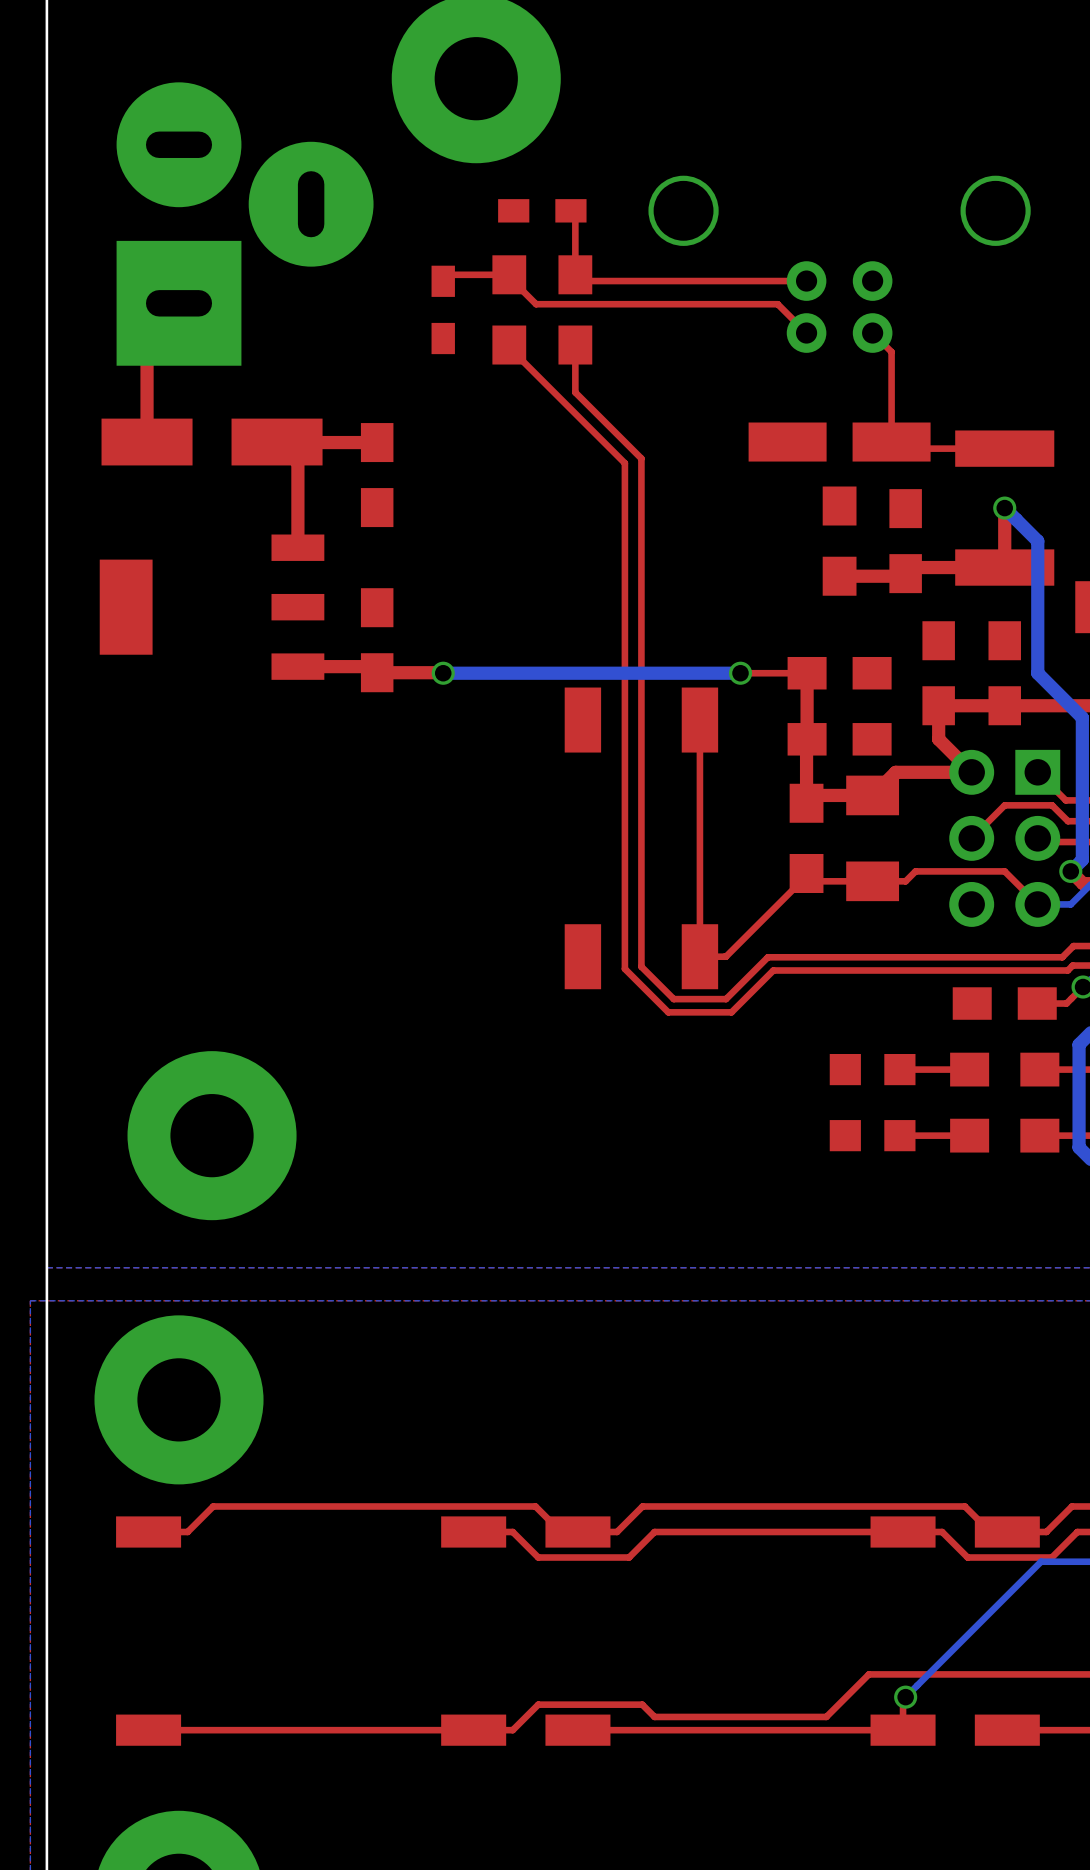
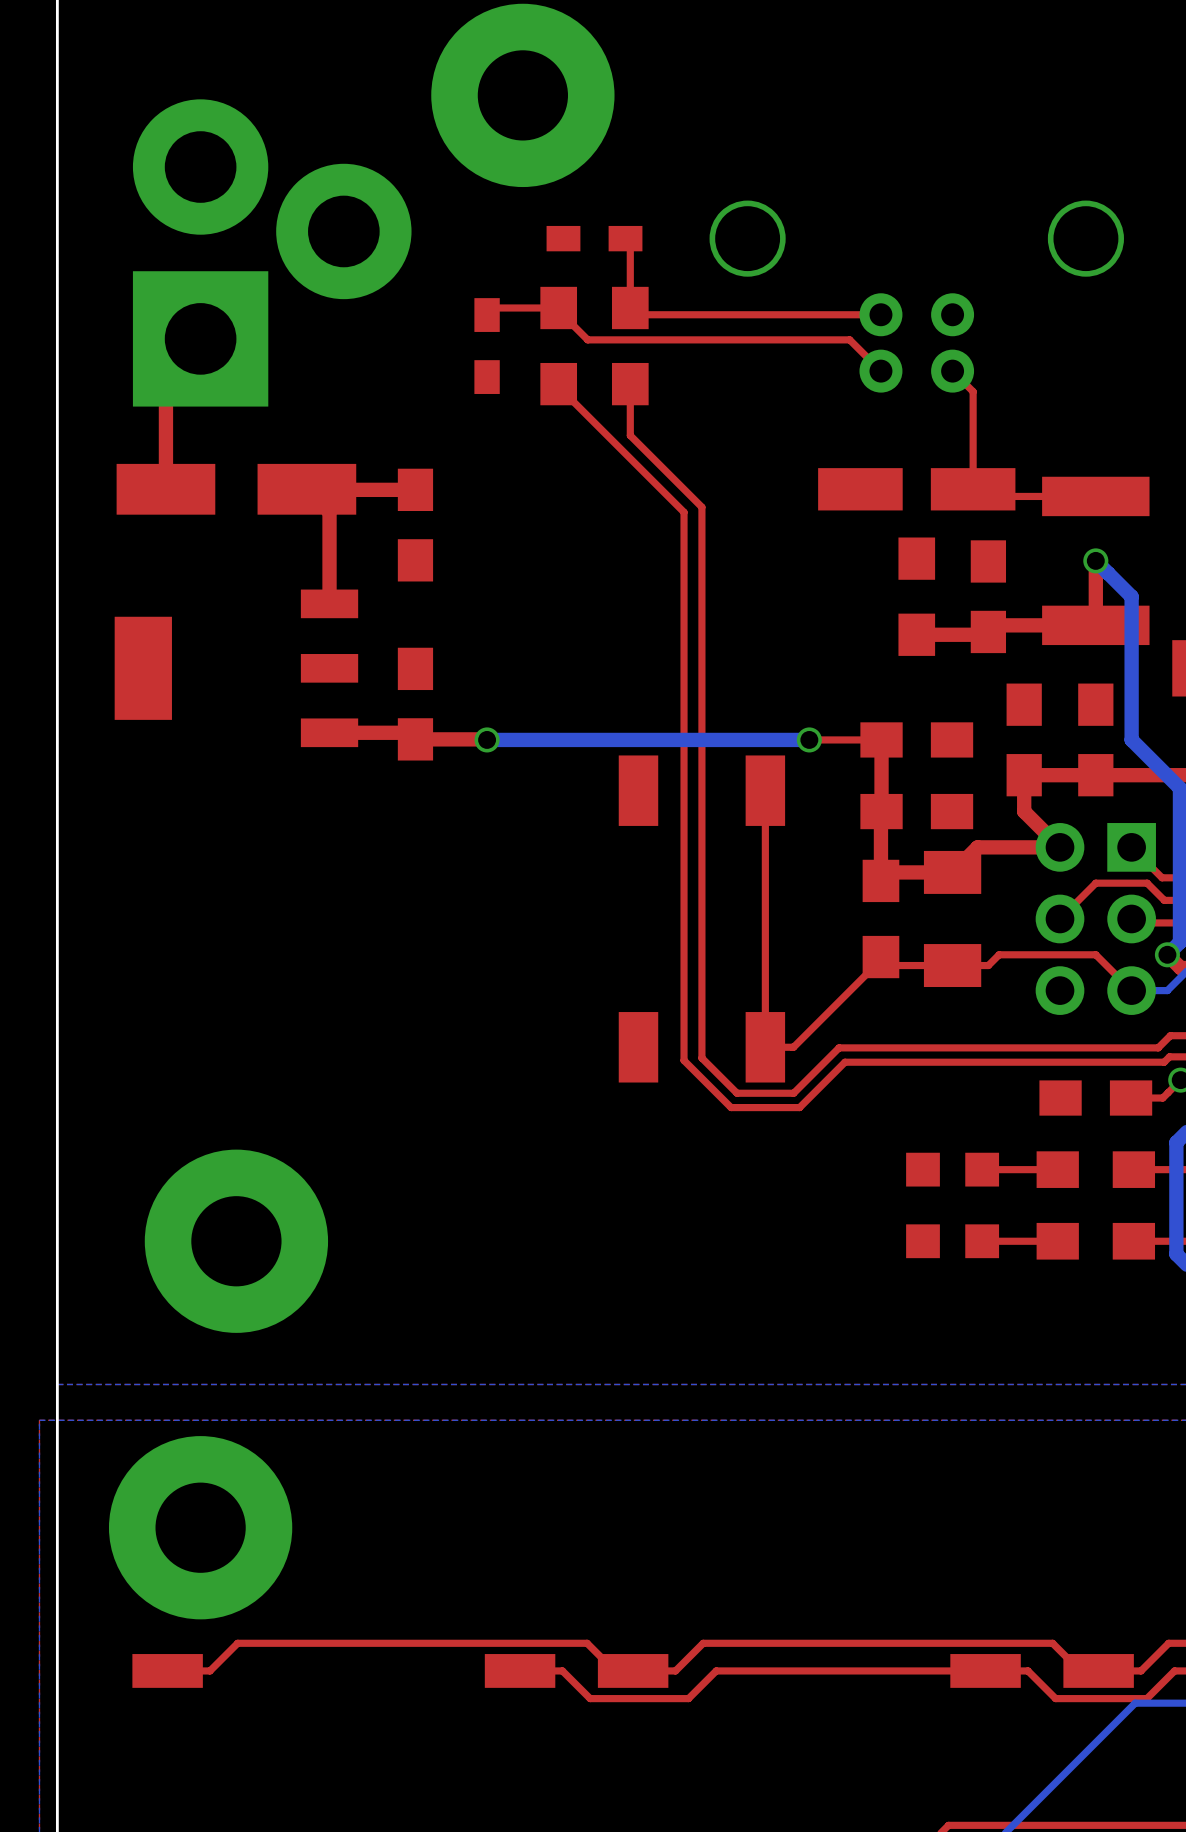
part footprint: [116, 82, 374, 366] -> [132, 99, 412, 407]

